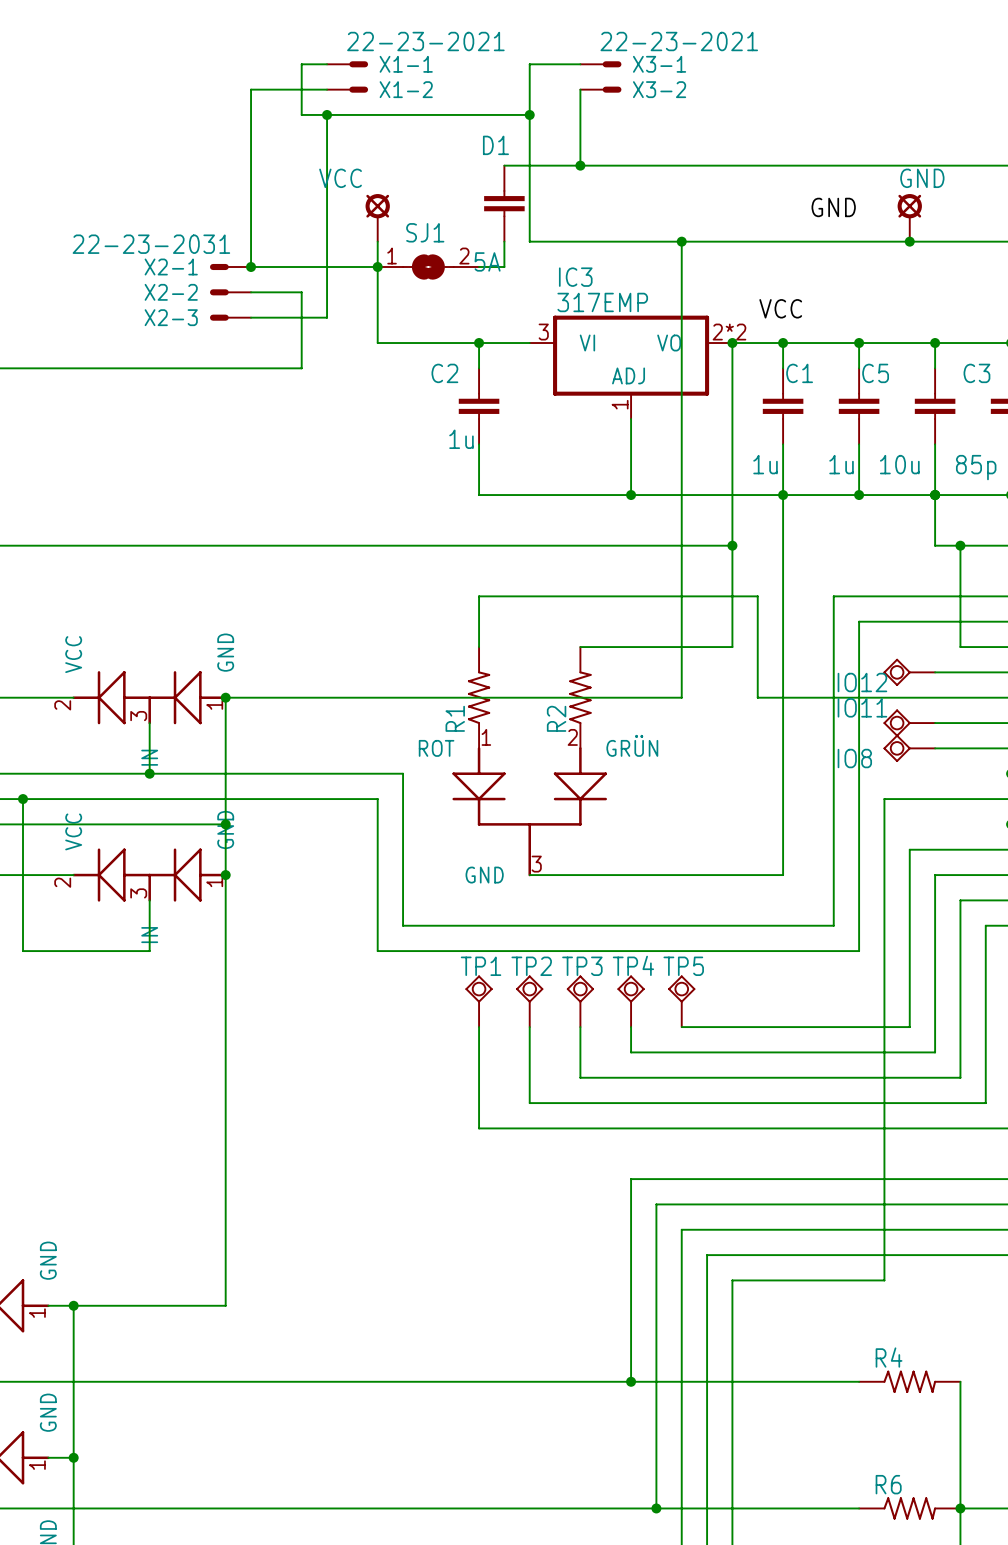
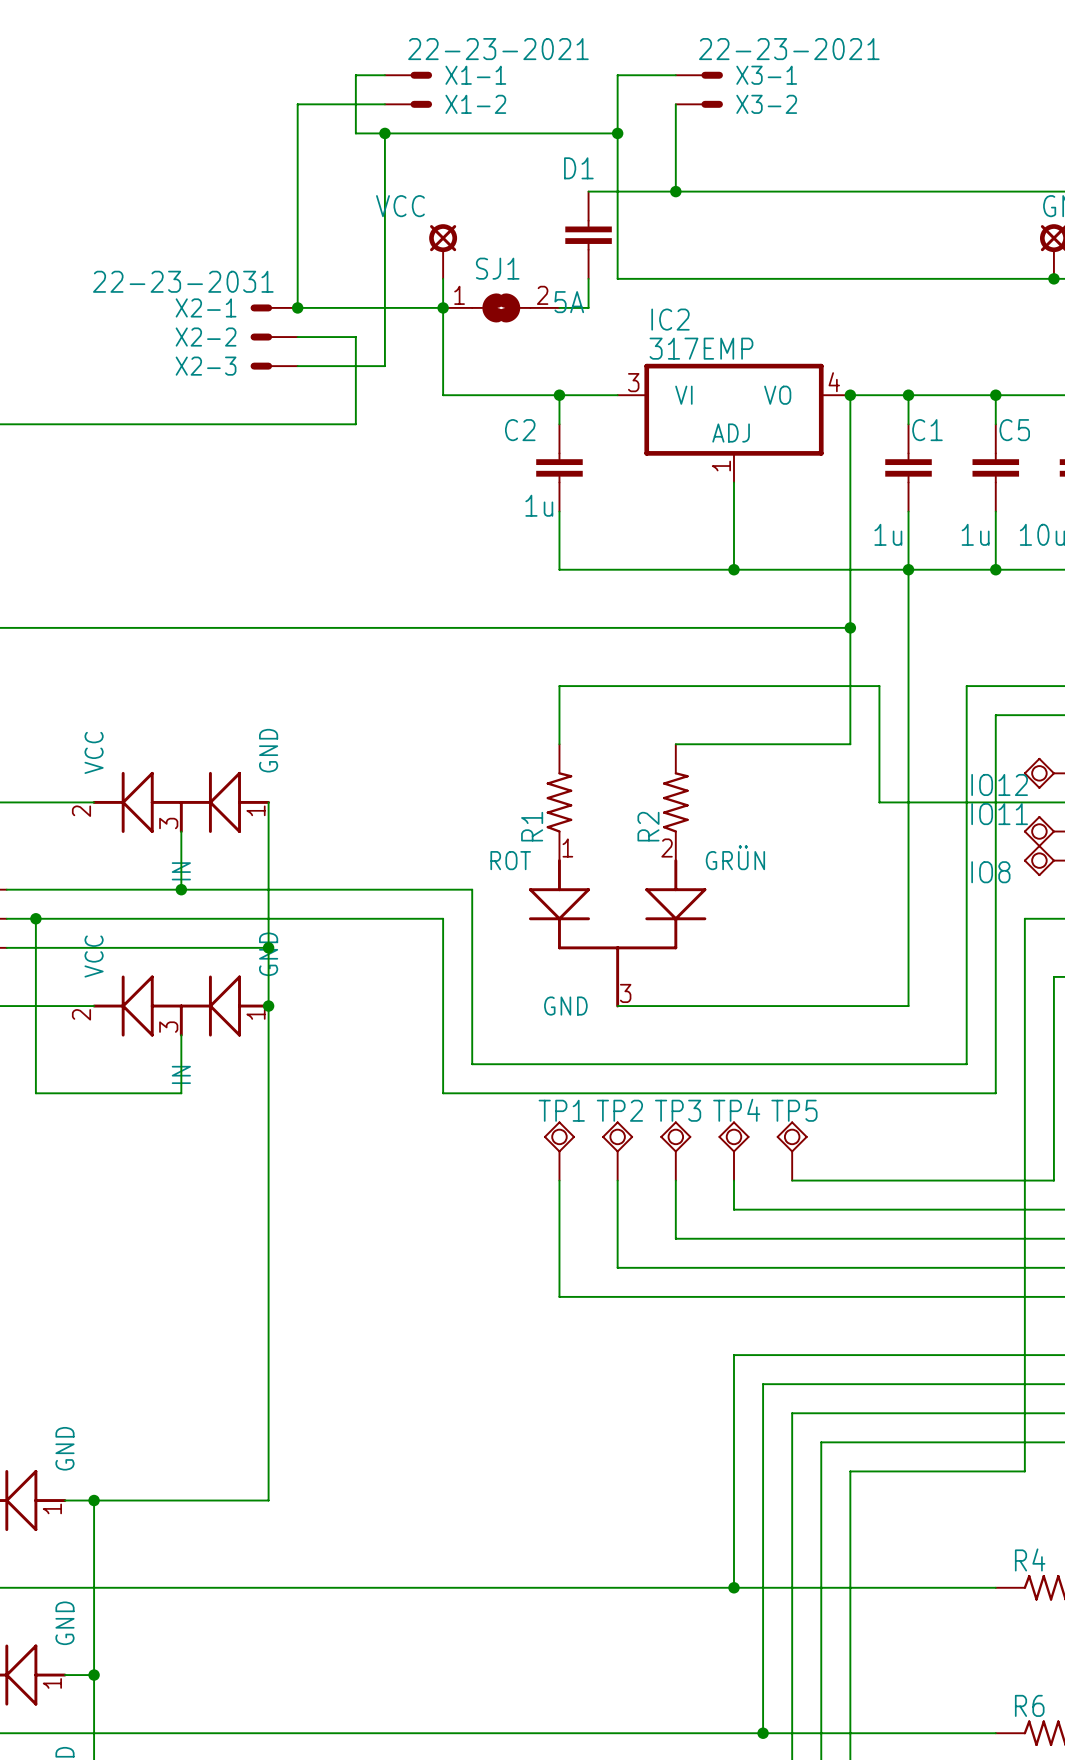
label: GND (833, 207) -> none
wire: (681, 241) (681, 697) (225, 697) -> none
junction: (681, 241) -> none
IC3 name: IC3 (575, 277) -> IC2 (670, 319)
label: VCC (780, 308) -> none
IC3 pin number: 2*2 (729, 332) -> 4 (834, 382)
junction: (225, 697) -> none

